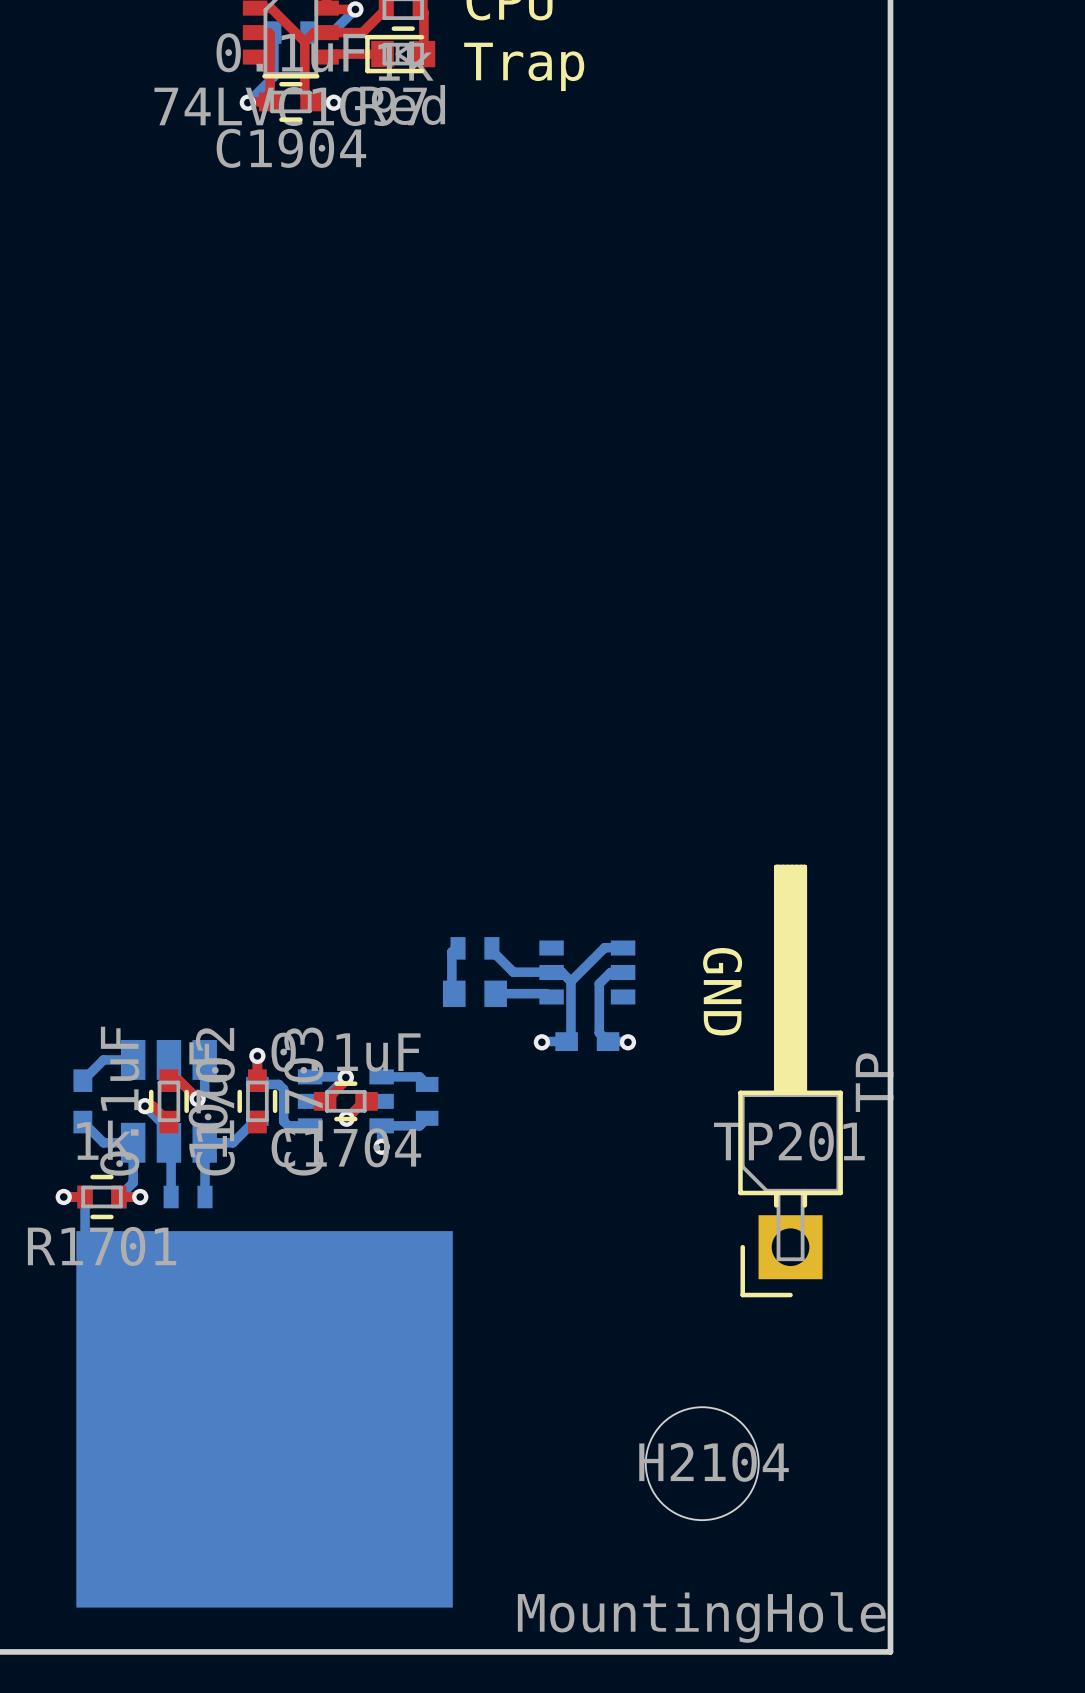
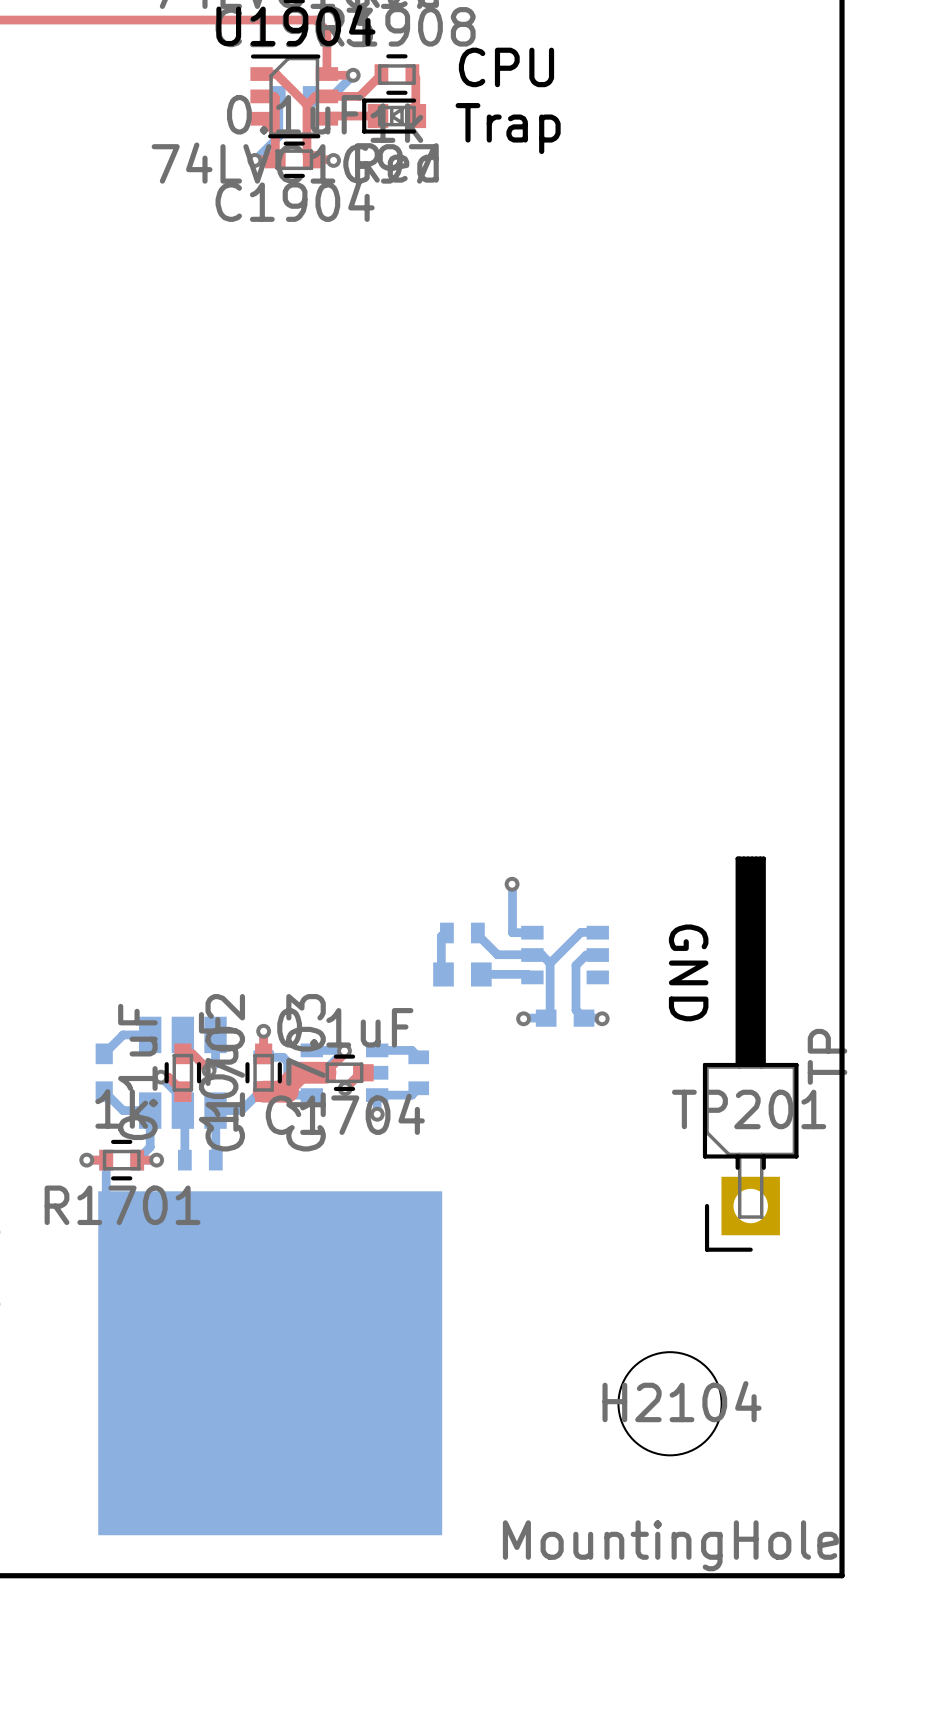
via: none -> (512, 884)
bottom track: none -> (512, 884) (512, 932) (532, 932)
top track: none -> (325, 1072) (299, 1072) (287, 1085) (287, 1091) (263, 1091)

